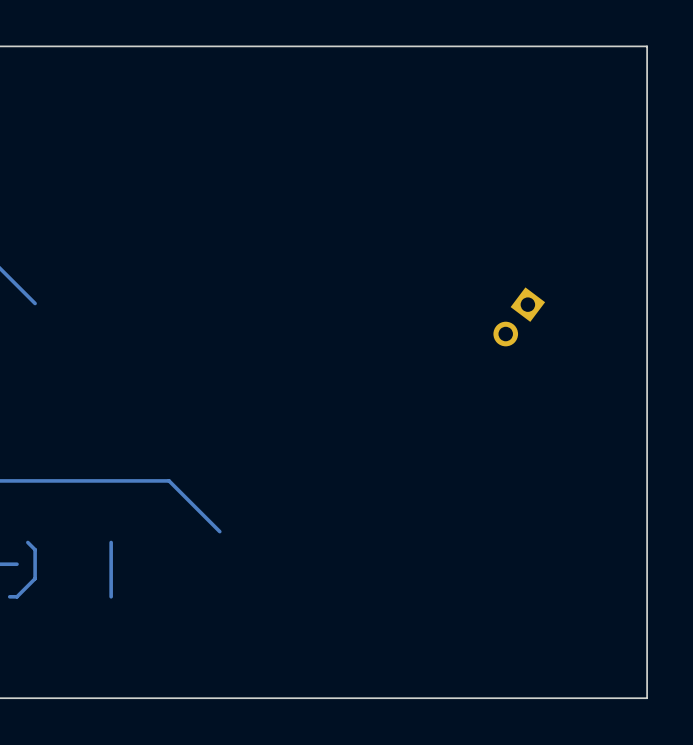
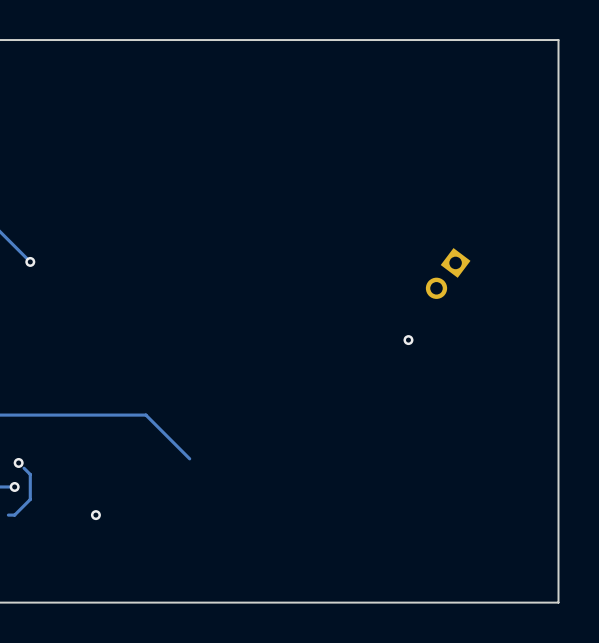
via: none -> (30, 261)
via: none -> (408, 340)
via: none -> (18, 462)
track: (111, 542) (111, 596) -> none
via: none -> (14, 486)
via: none -> (95, 515)

